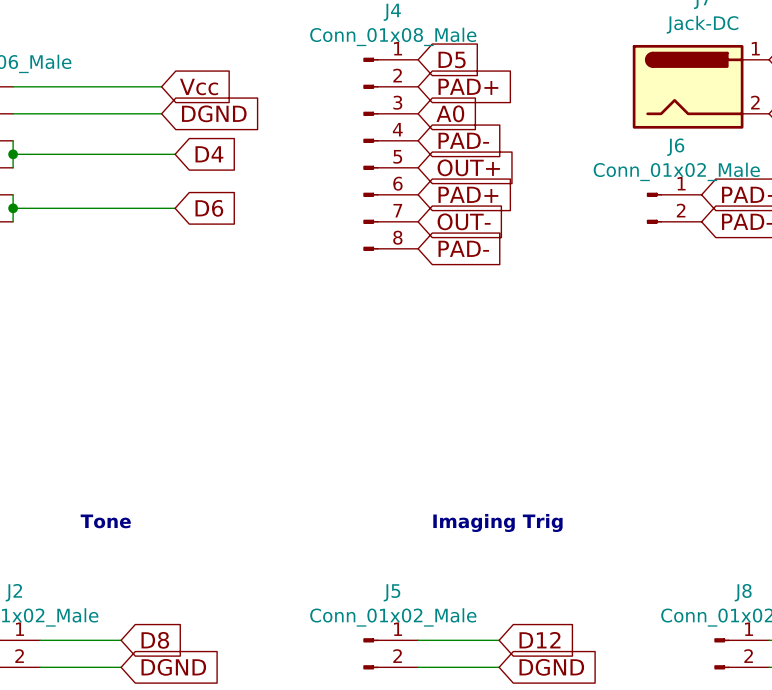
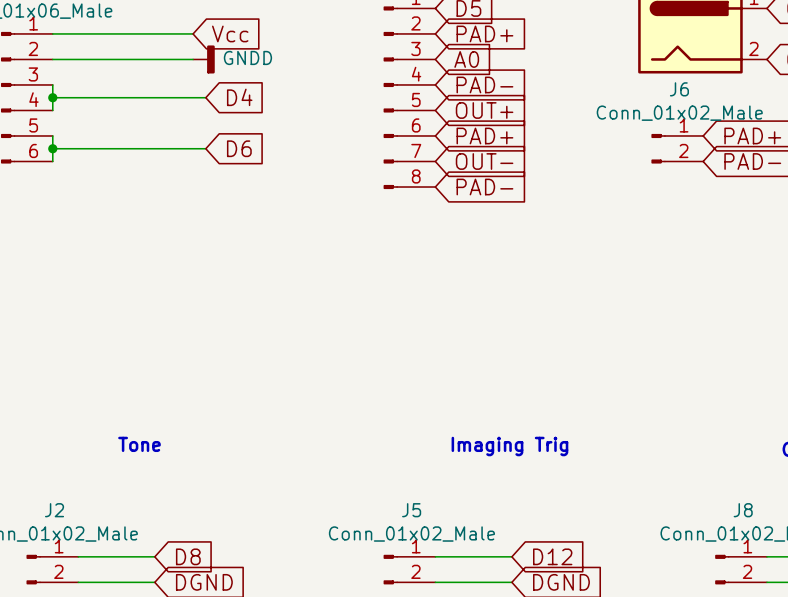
power symbol: none -> GNDD (203, 59)
global label: DGND (214, 113) -> none

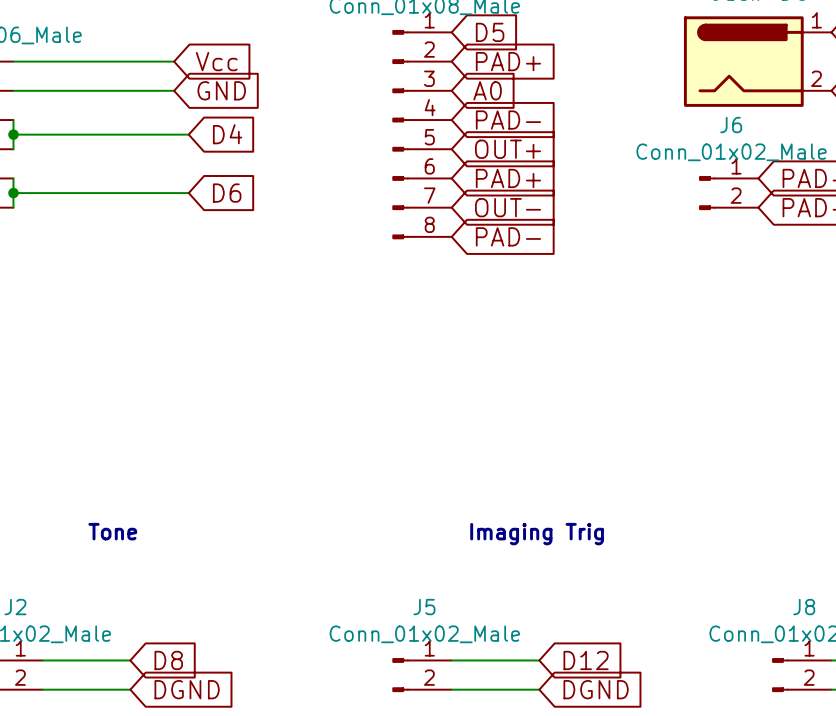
power symbol: GNDD (203, 59) -> none
global label: none -> GND (221, 90)

